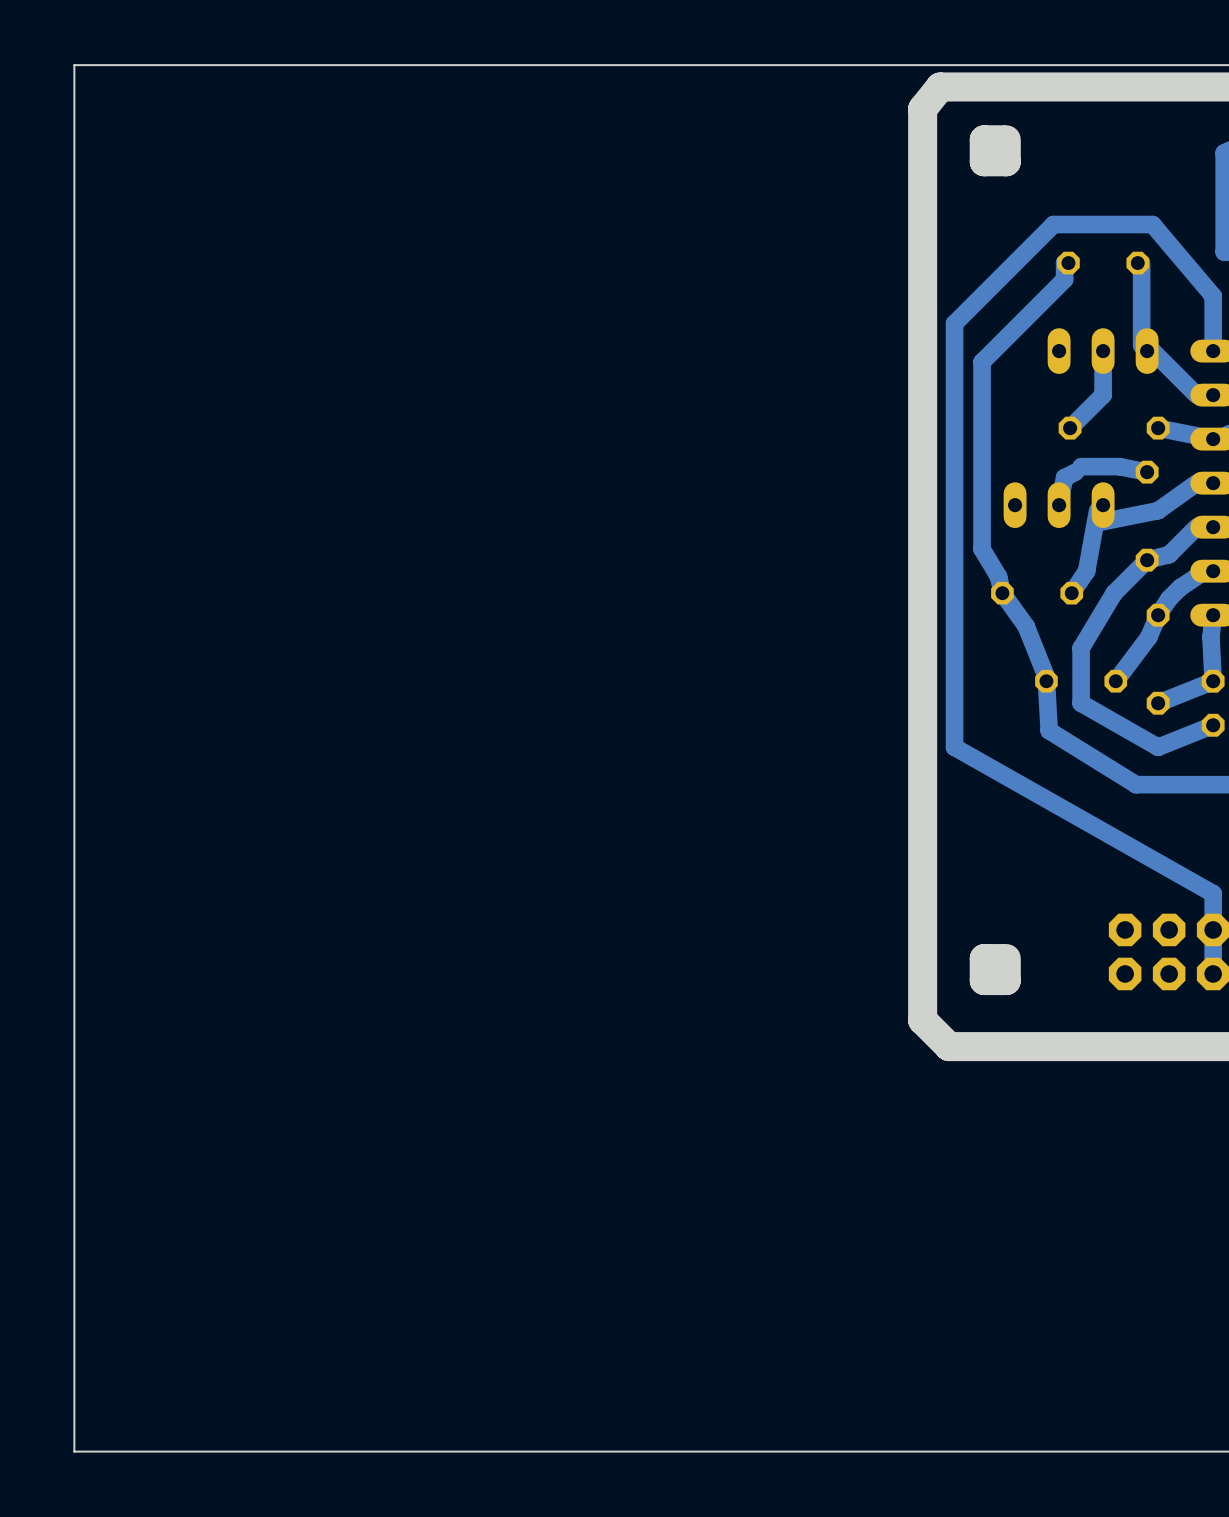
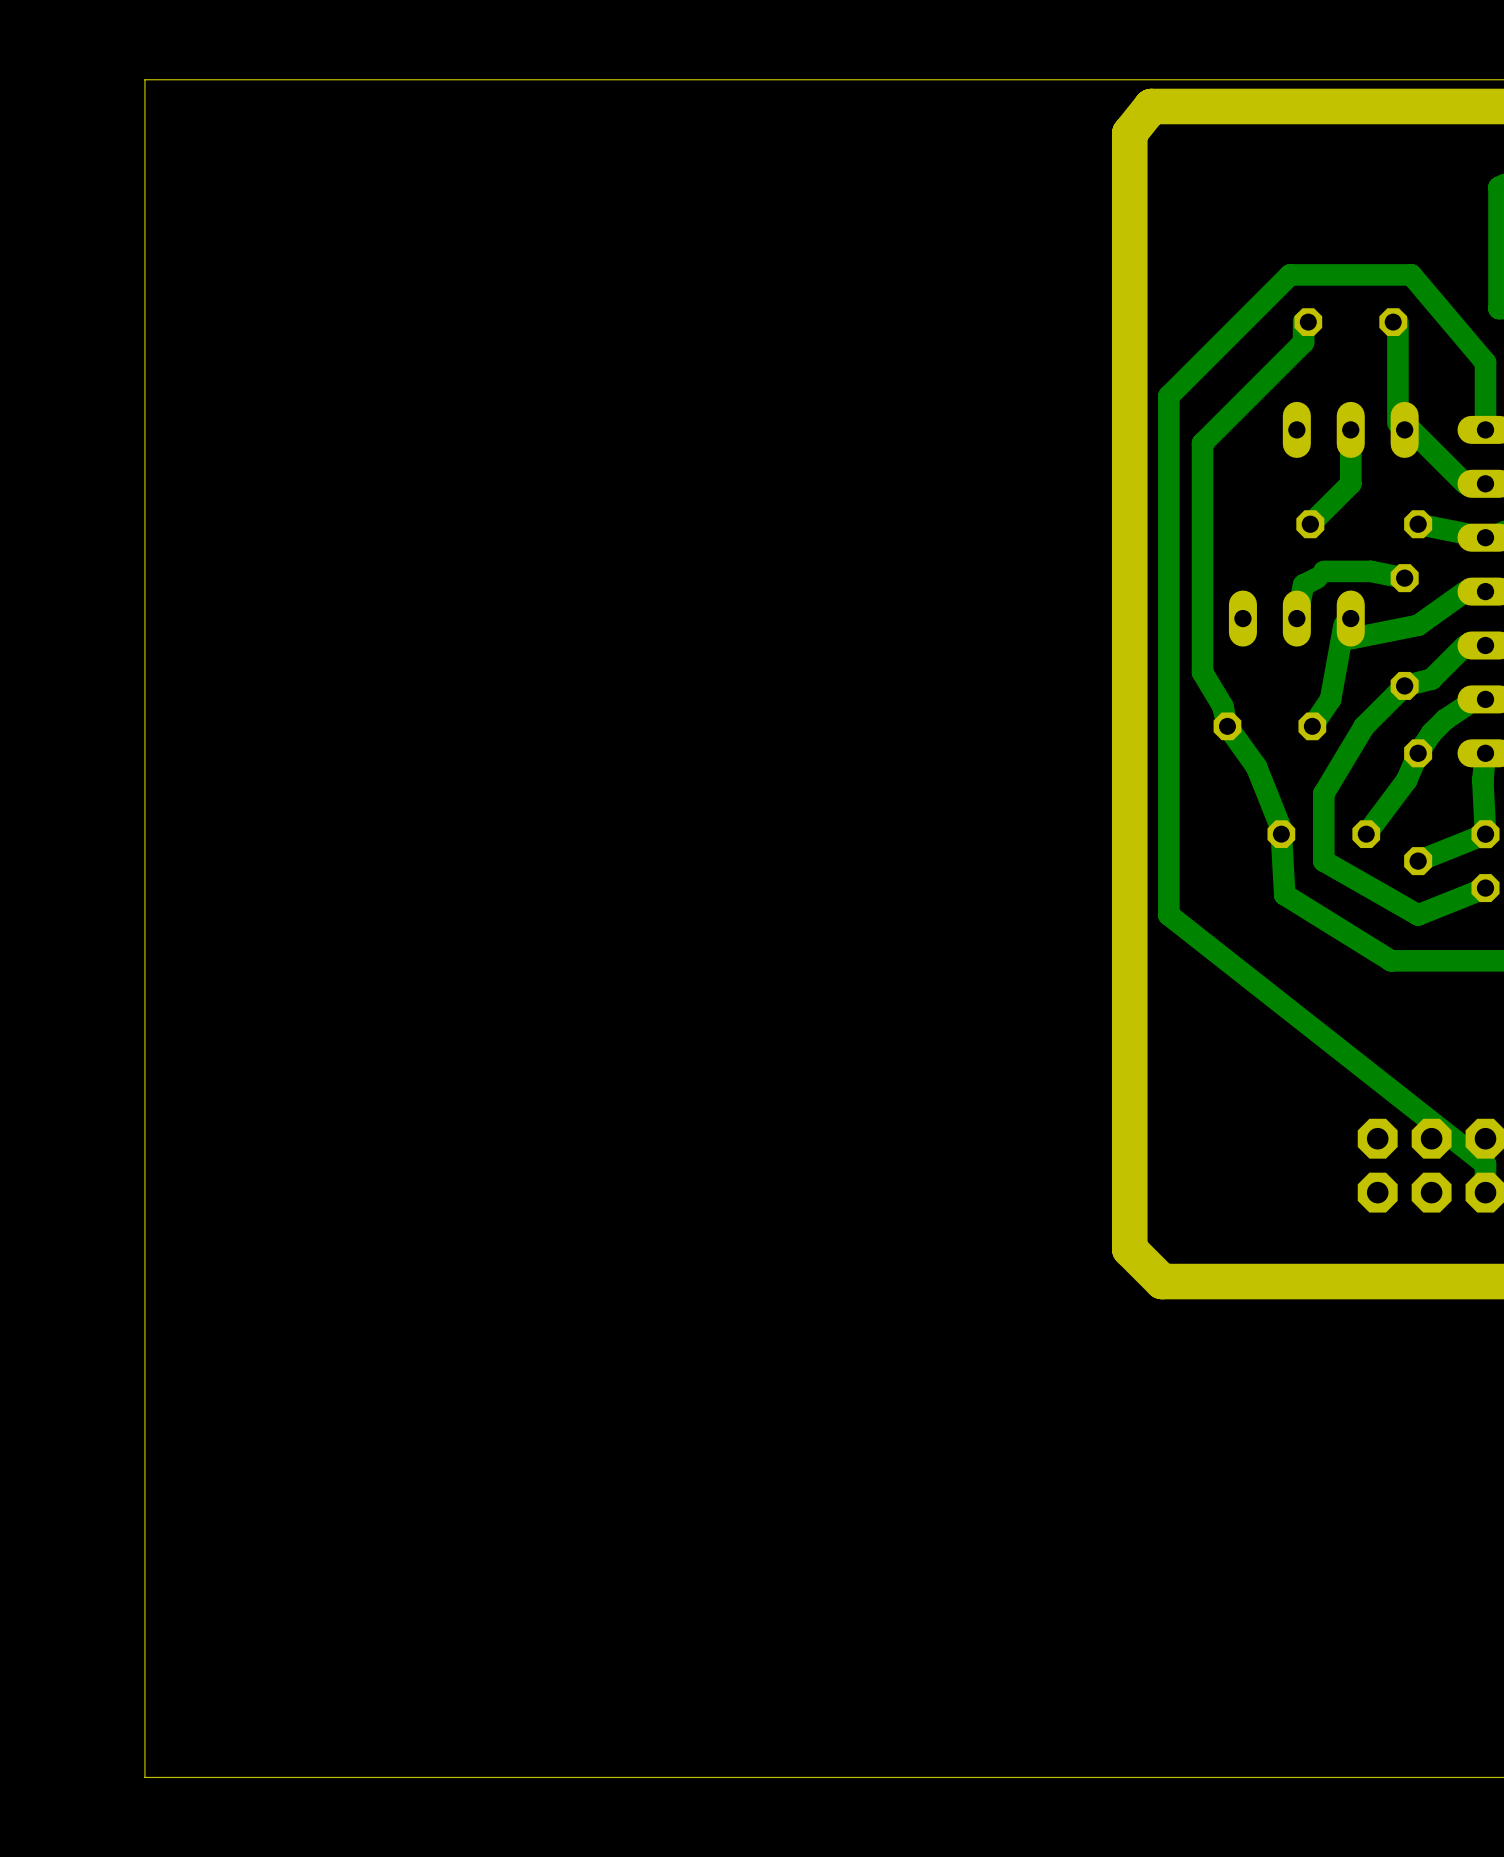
board edge: (118, 65) (74, 65) (74, 1451) (118, 1451) -> (144, 79) (144, 1777)
board edge: (1006, 139) (1006, 161) (984, 161) (984, 139) (1001, 139) -> none
track: (954, 747) (1213, 893) (1213, 950) -> (1168, 915) (1485, 1164)
board edge: (1006, 958) (1006, 980) (984, 980) (984, 958) (1001, 958) -> none

